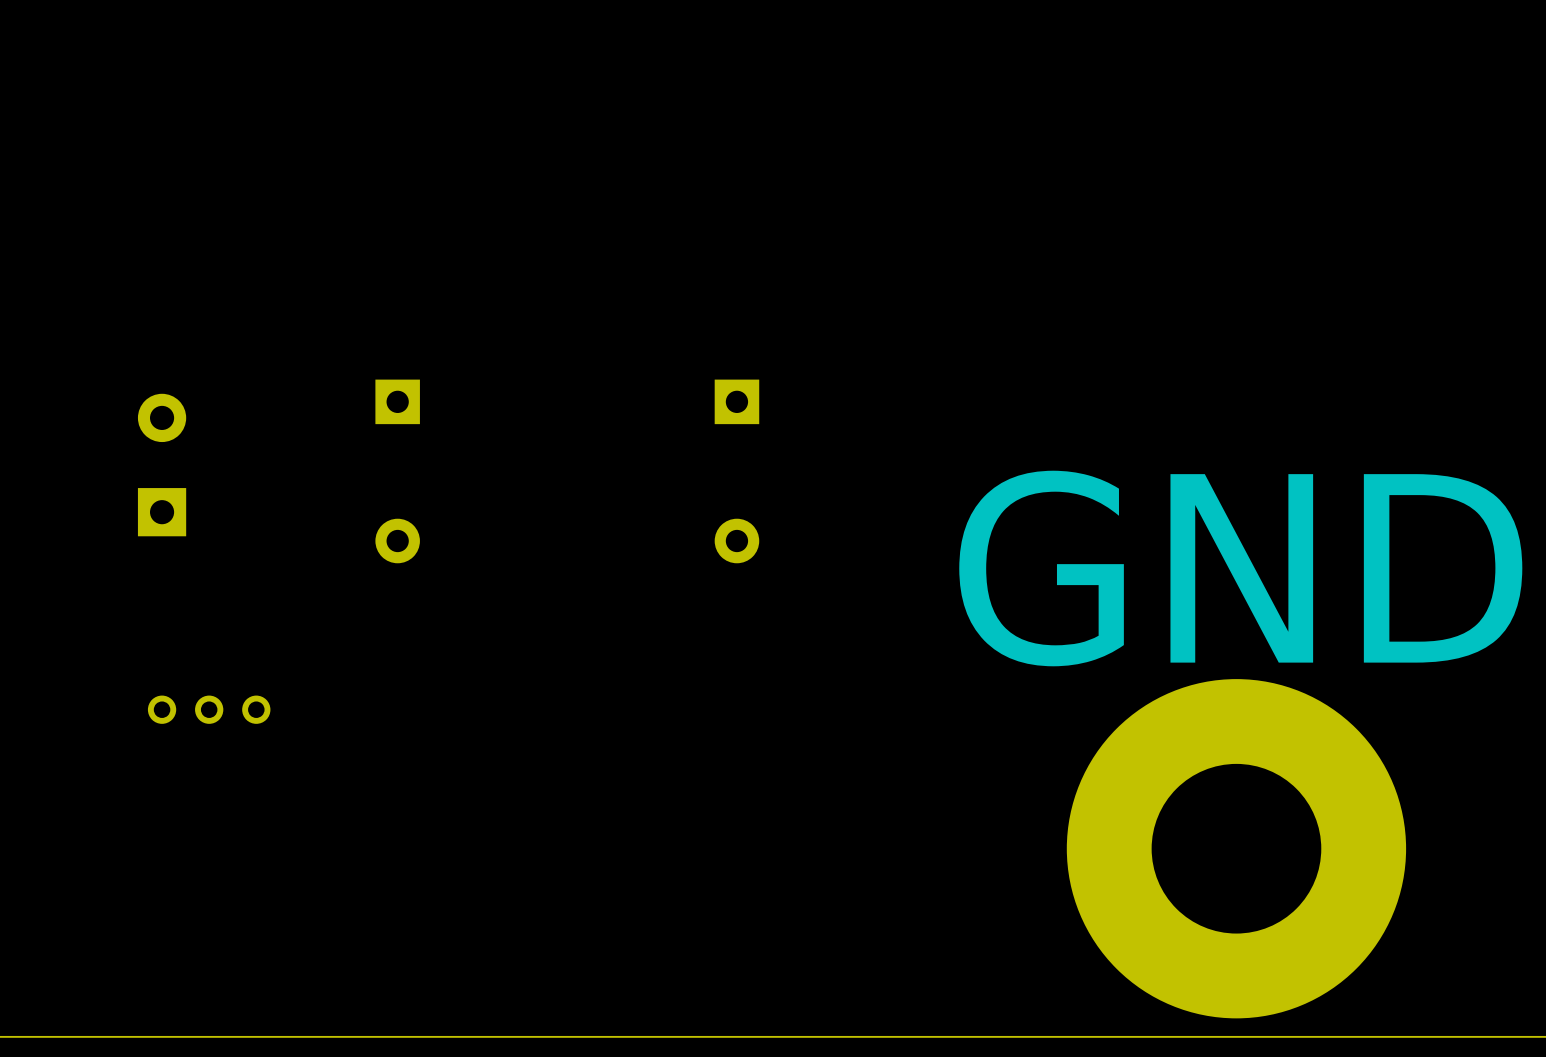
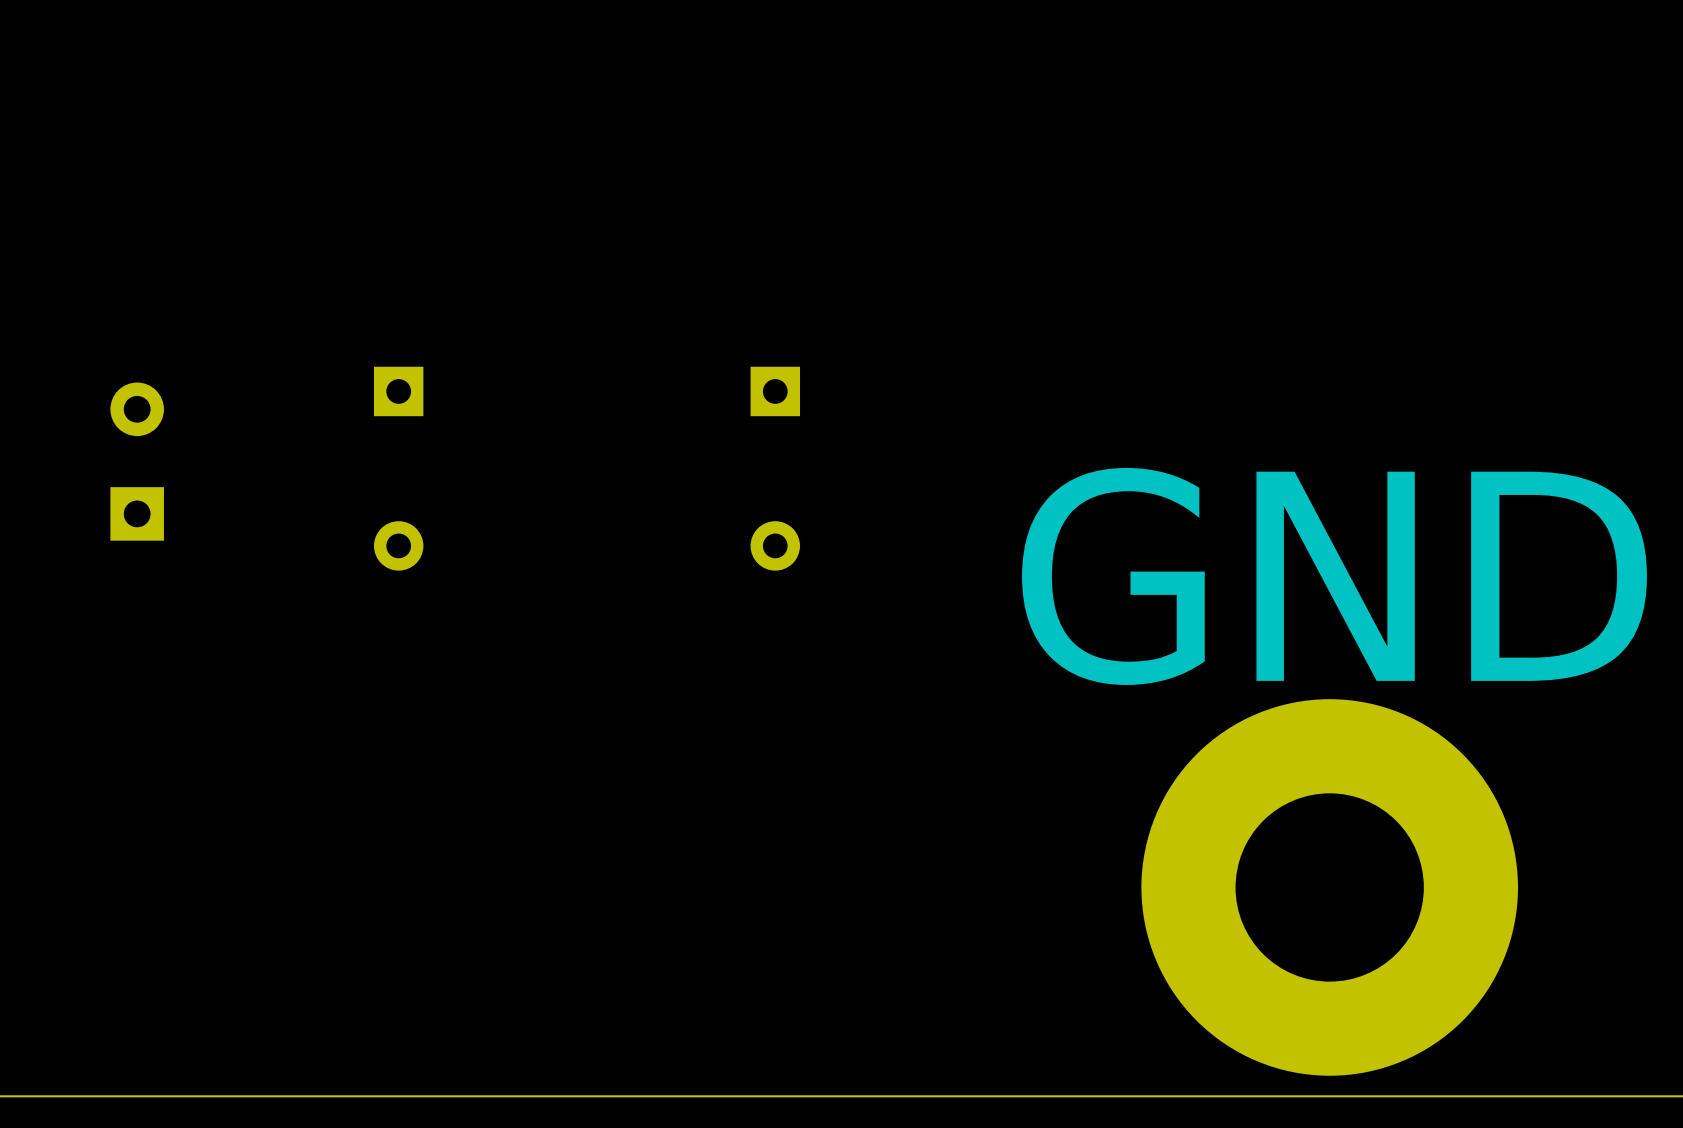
part: (209, 709) -> none

